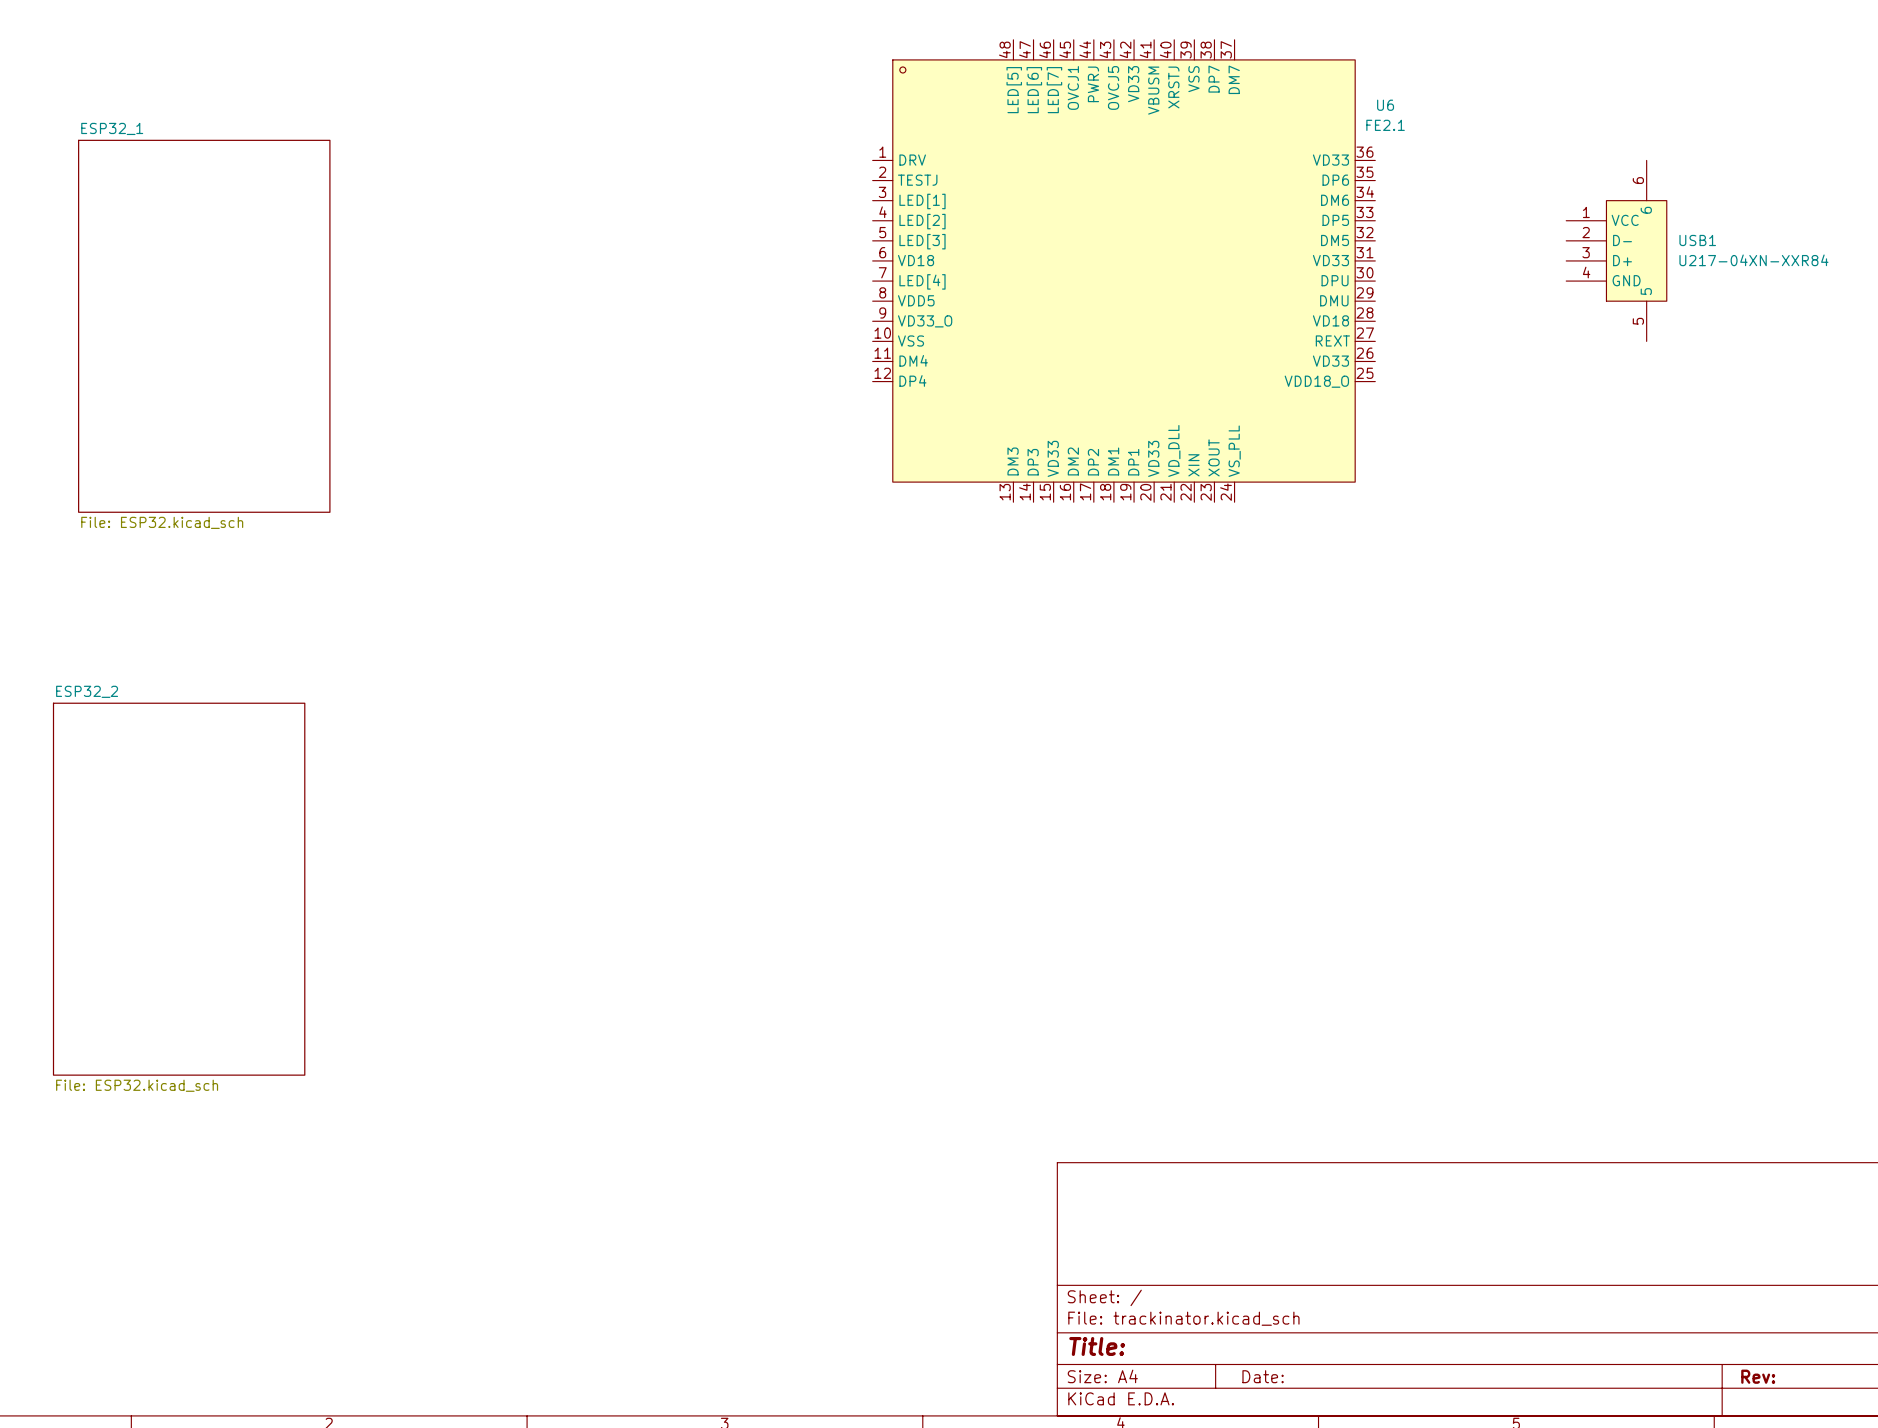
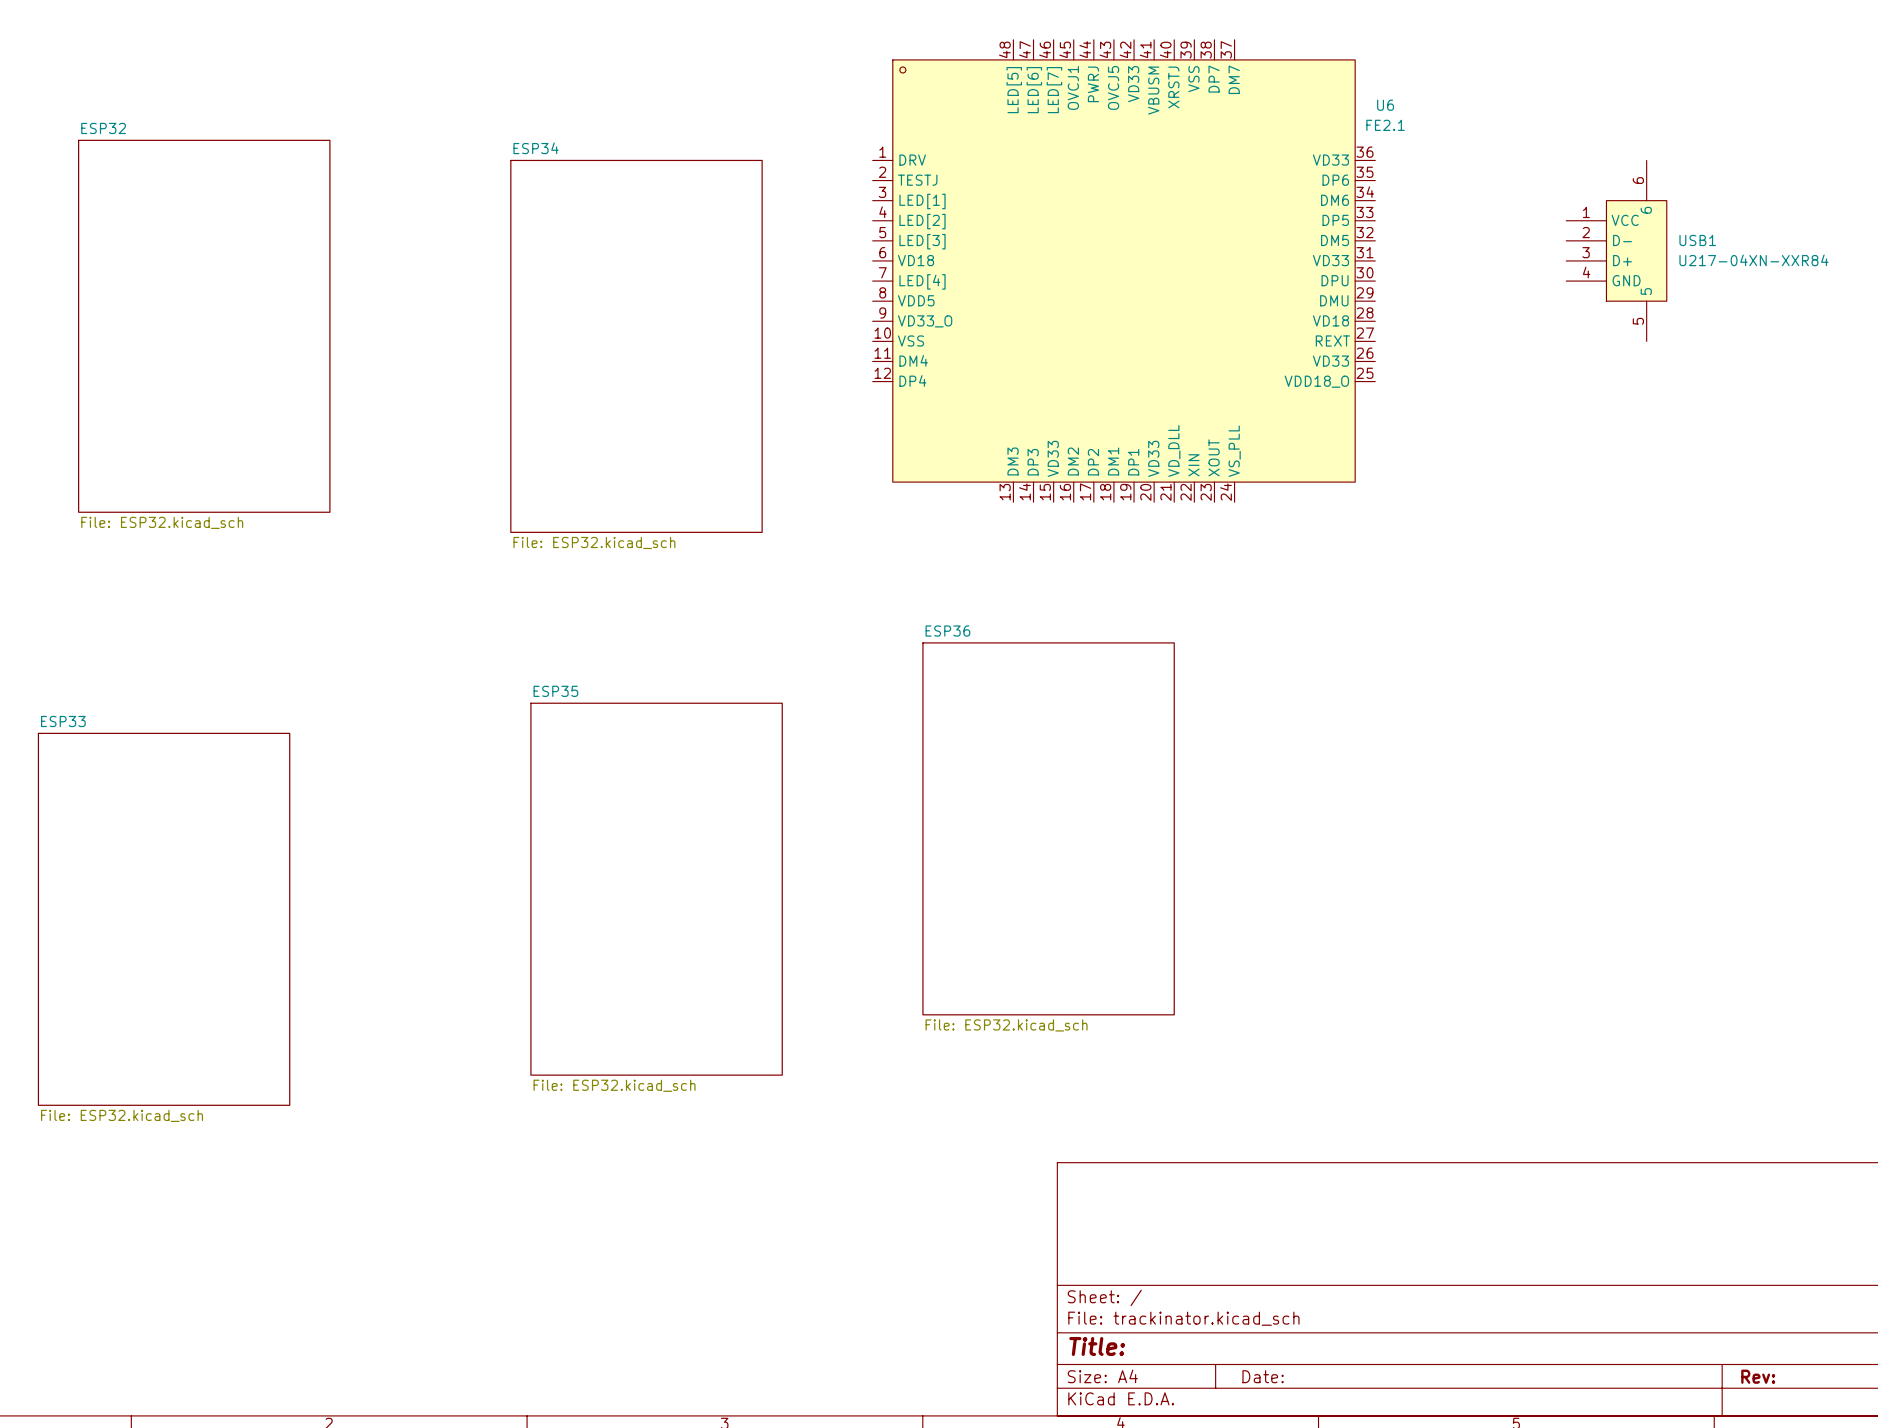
sheet ESP32_1 name: ESP32_1 (112, 128) -> ESP32 (103, 128)
sheet ESP34: none -> File: ESP32.kicad_sch (636, 346)
sheet ESP36: none -> File: ESP32.kicad_sch (1048, 828)
sheet ESP32_2: File: ESP32.kicad_sch (179, 889) -> none
sheet ESP35: none -> File: ESP32.kicad_sch (656, 889)
sheet ESP33: none -> File: ESP32.kicad_sch (164, 919)

